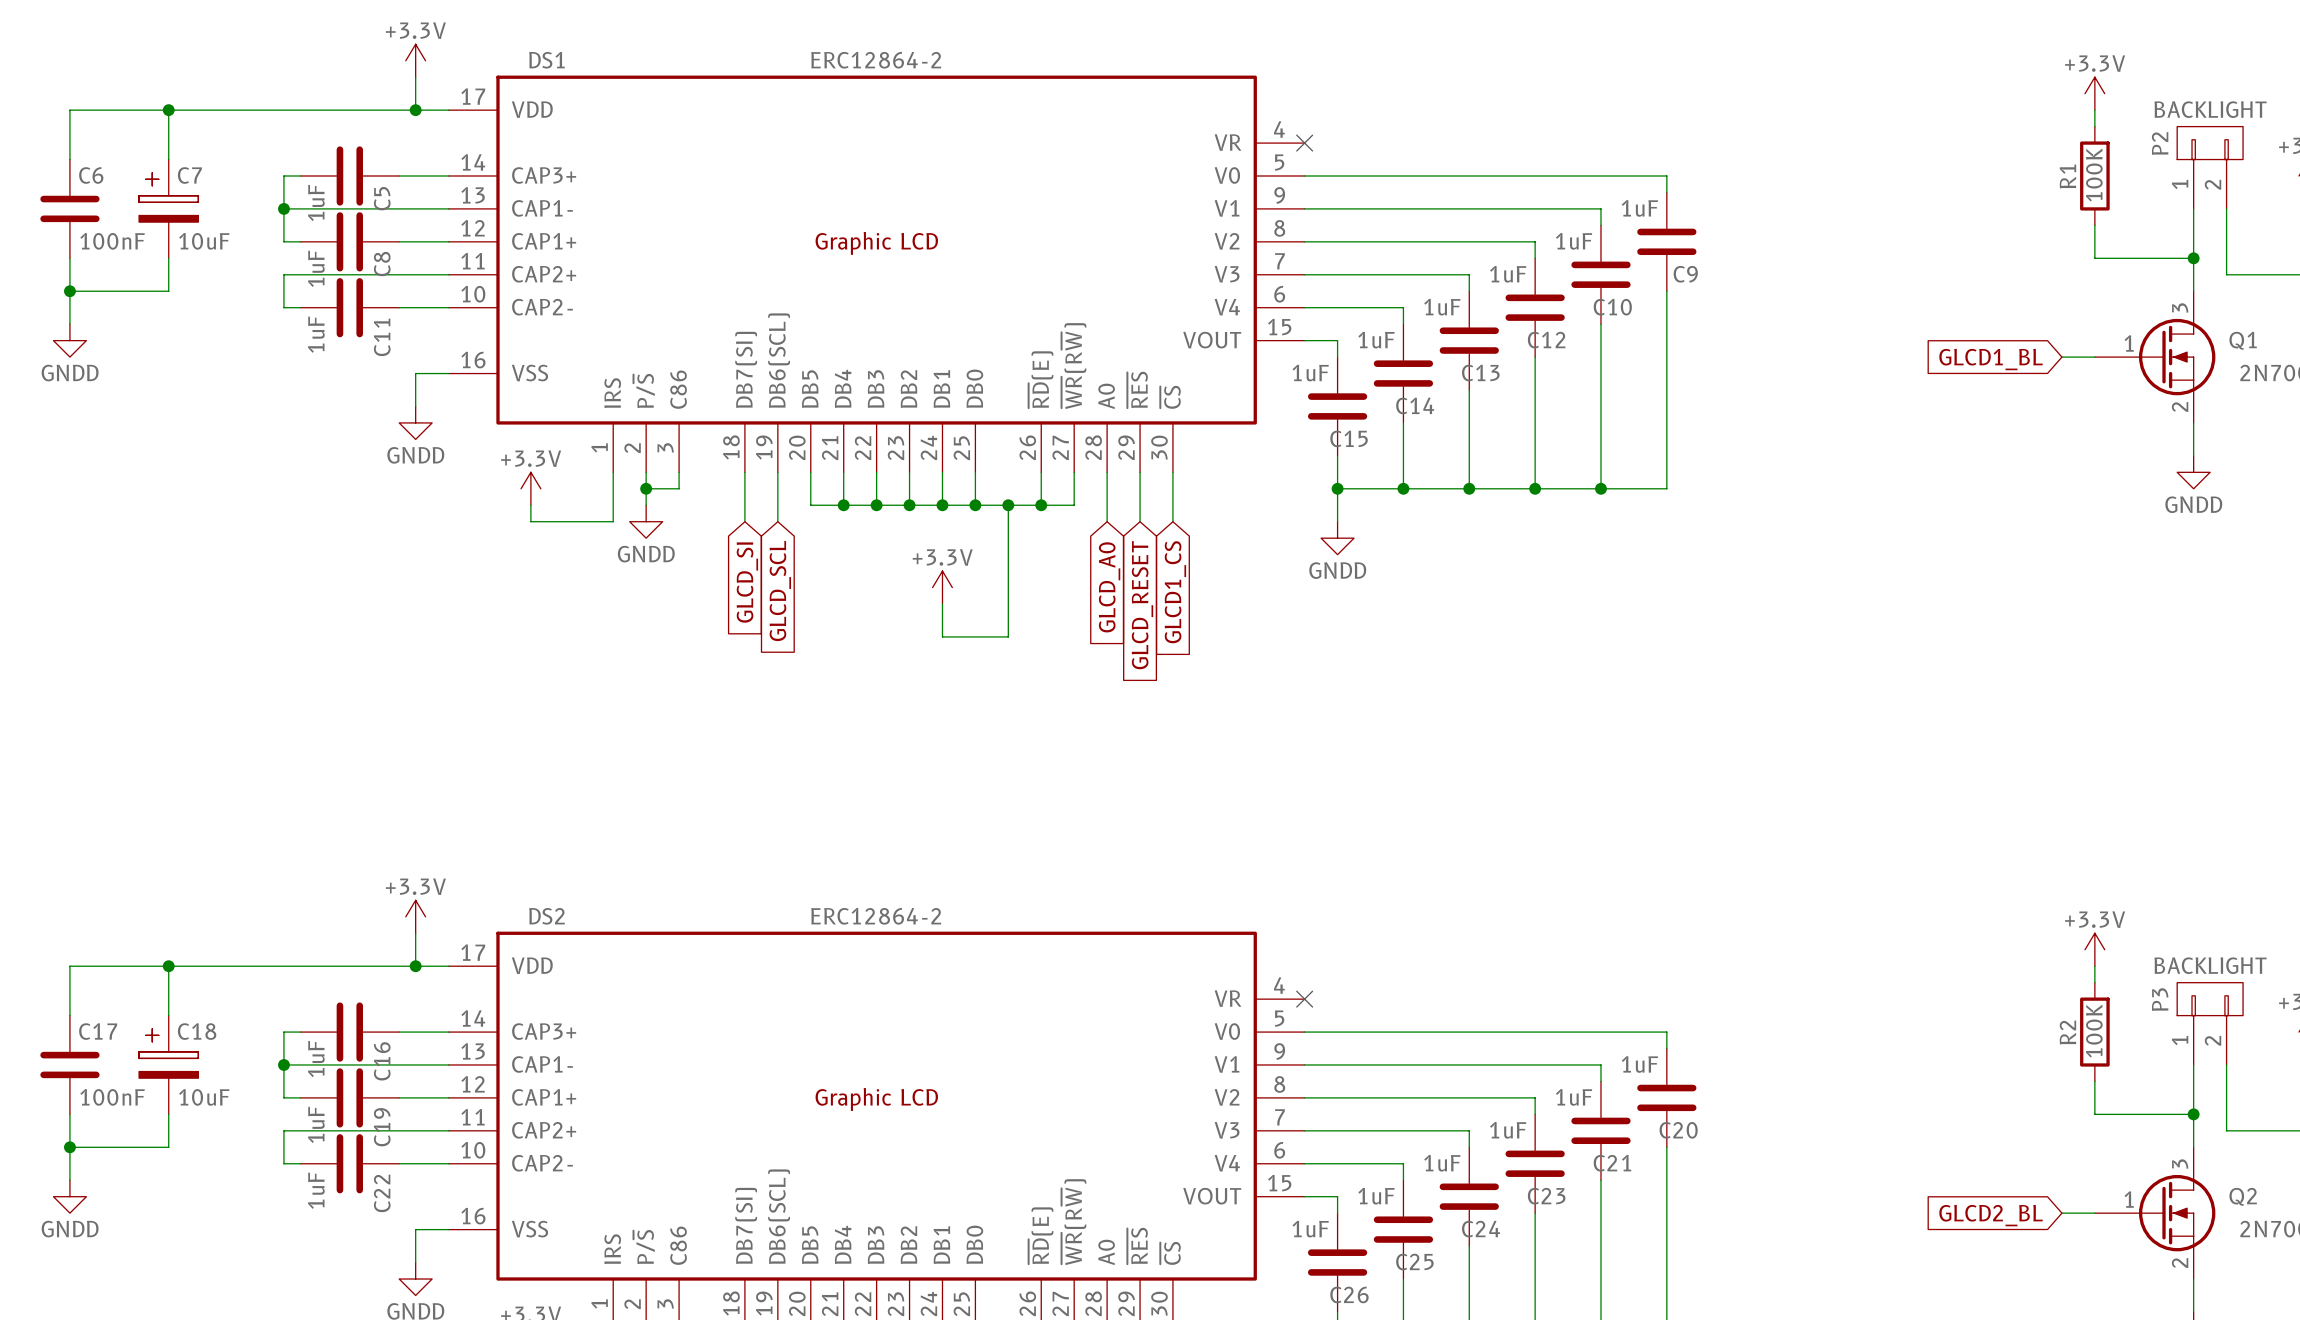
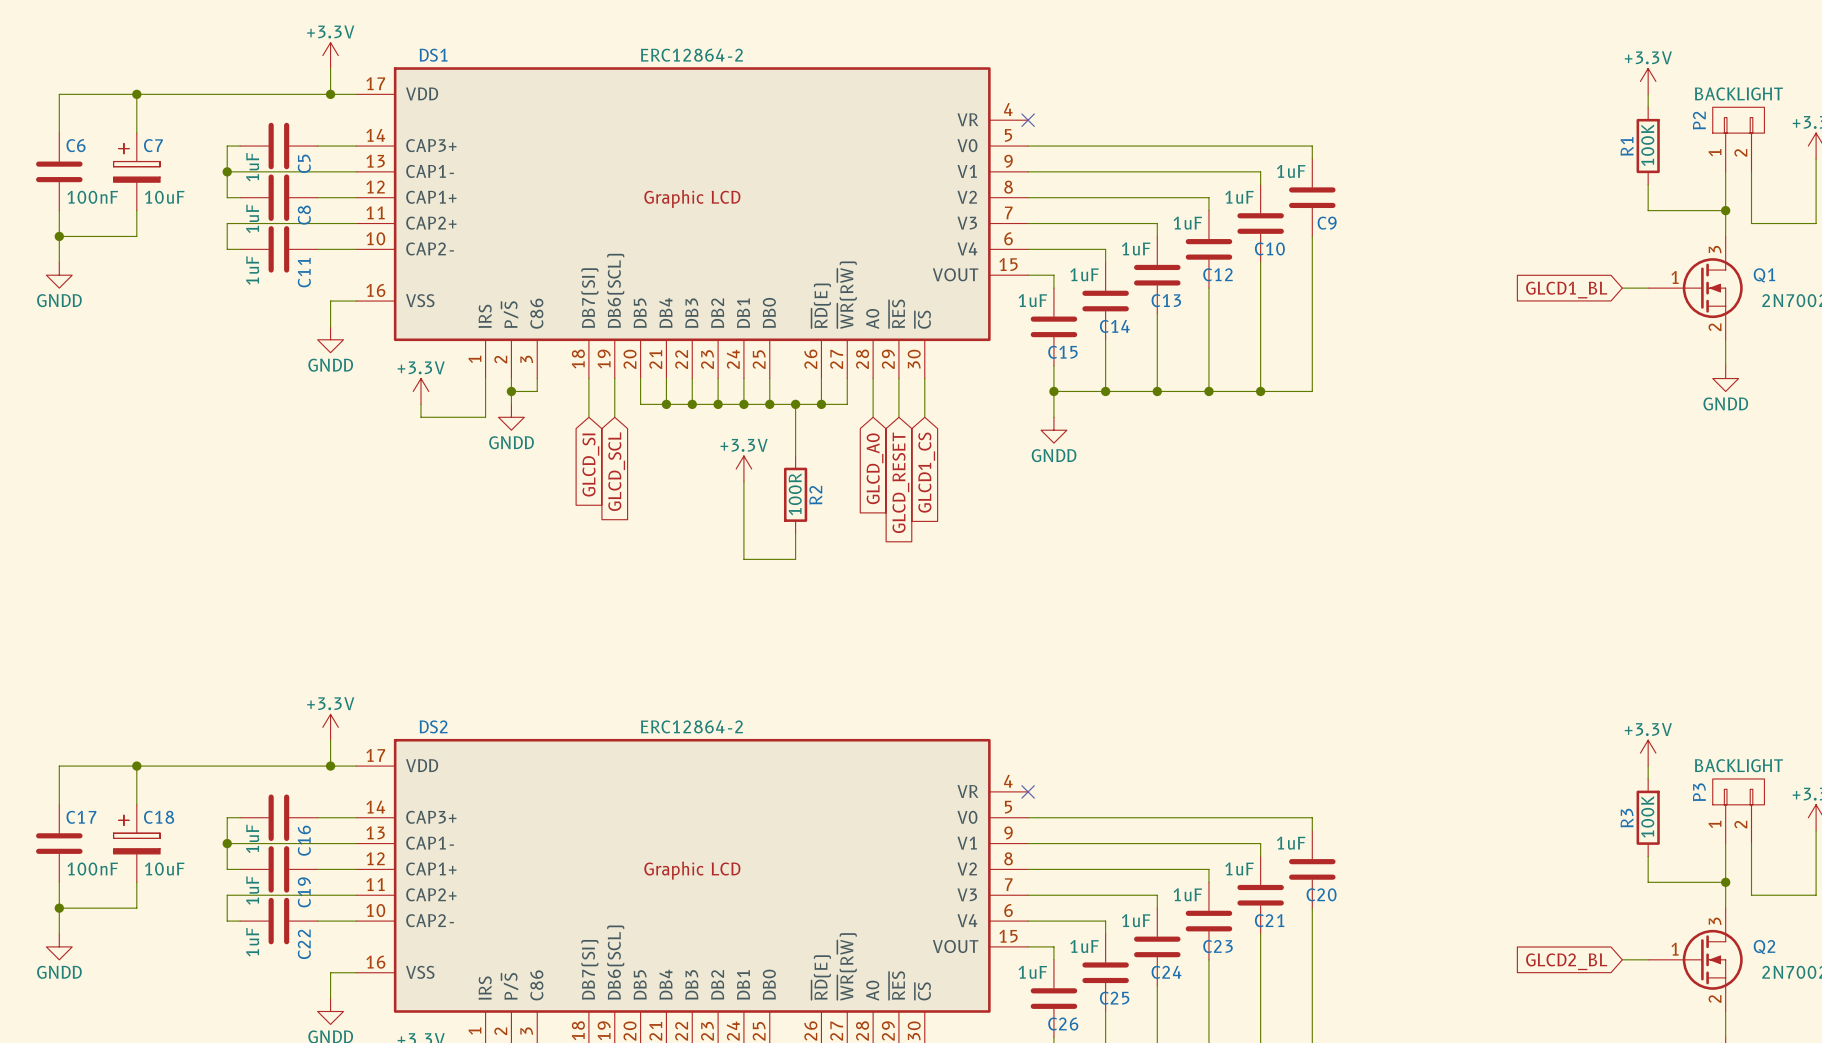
wire: (1008, 571) (1008, 636) (942, 636) -> (795, 533) (795, 559) (743, 559) (743, 507)
R2: none -> 100R (795, 494)
R2 name: R2 (2067, 1032) -> R3 (1627, 818)

